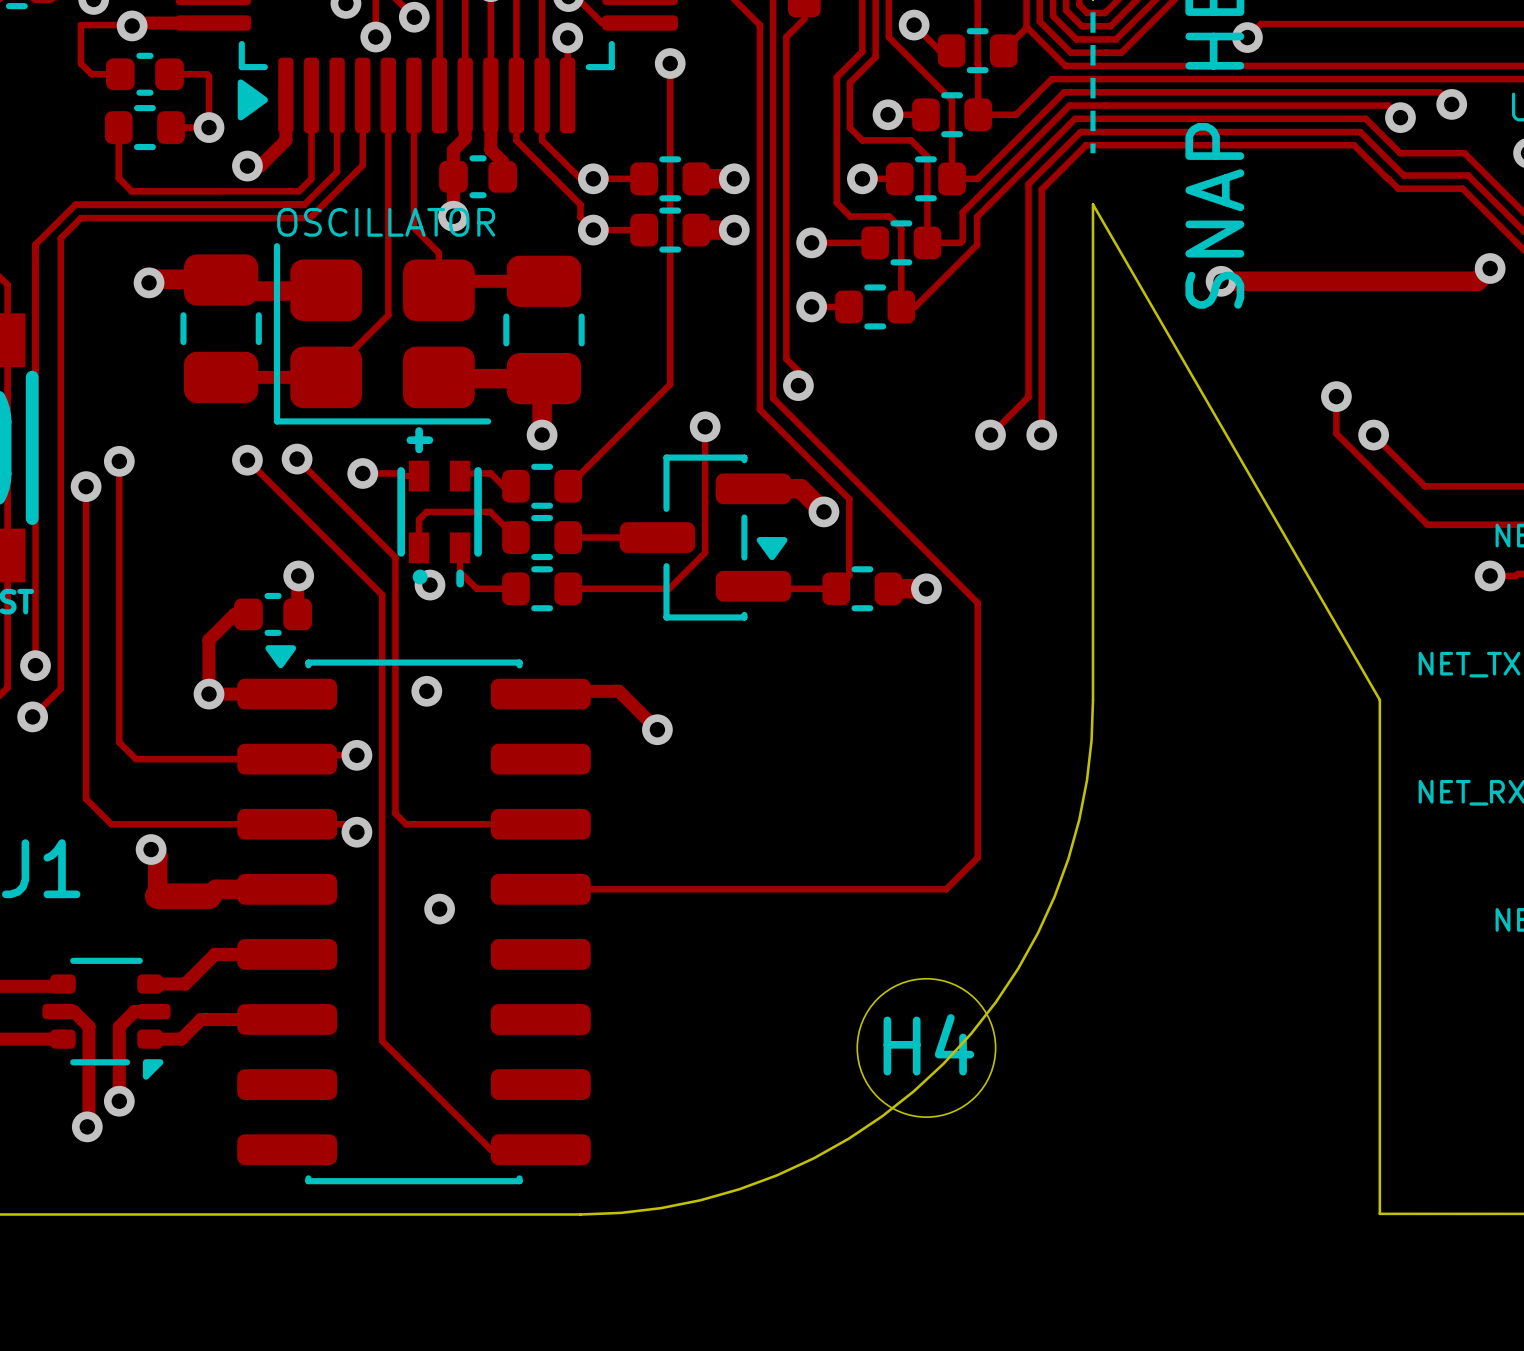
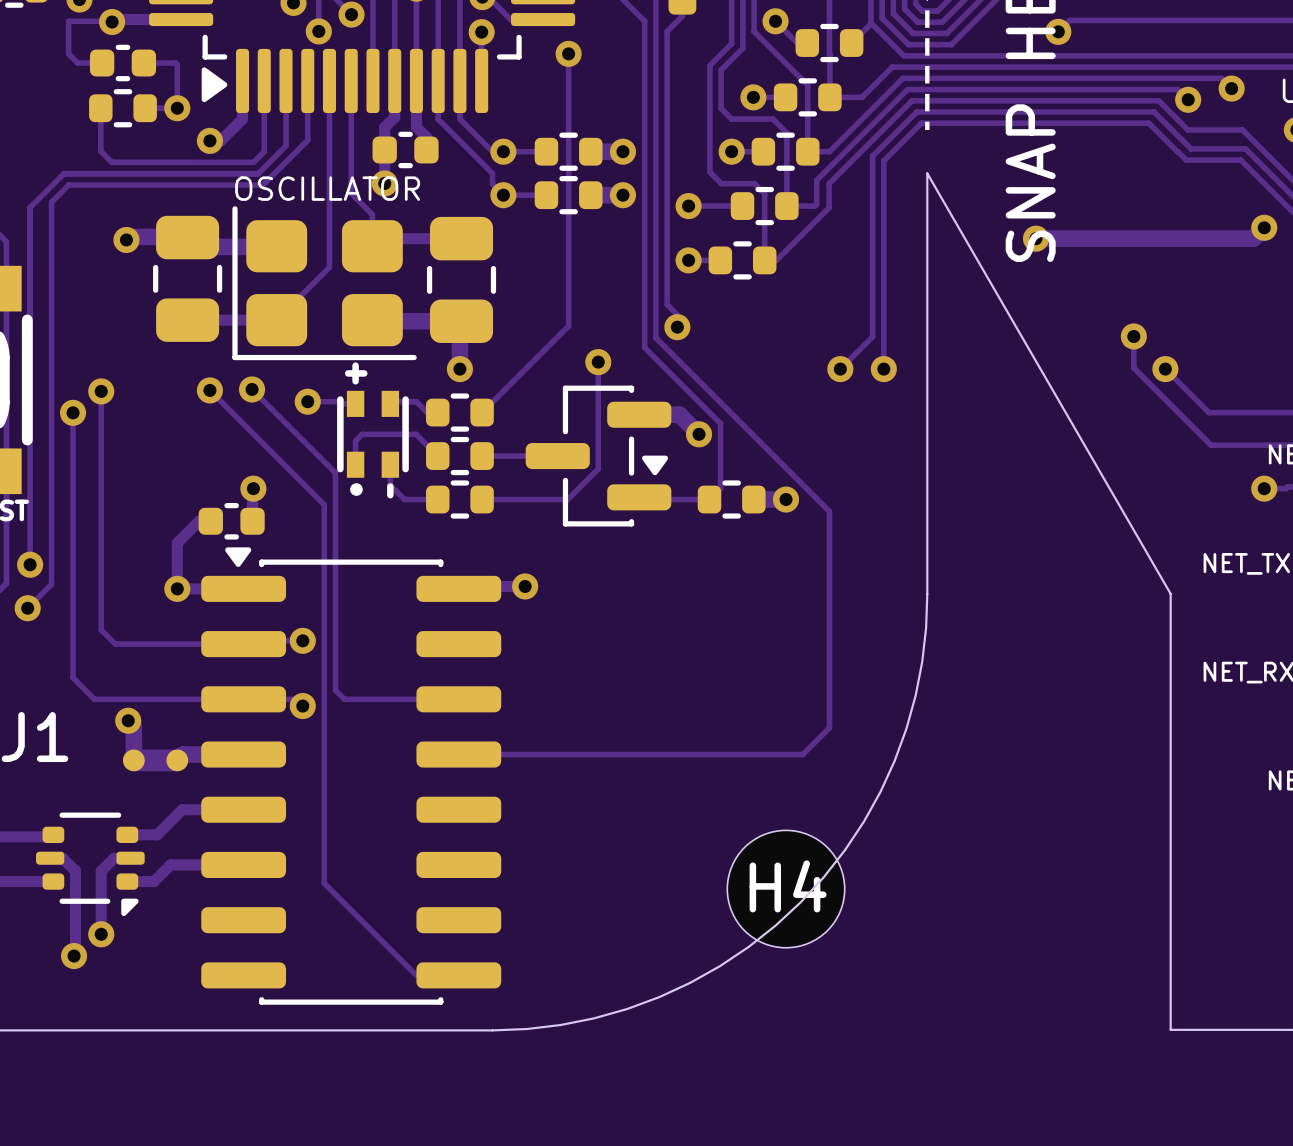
via: (430, 585) -> none
via: (426, 691) -> none
track: (618, 691) (657, 729) -> none
via position: (657, 729) -> (525, 586)
via: (439, 909) -> none

